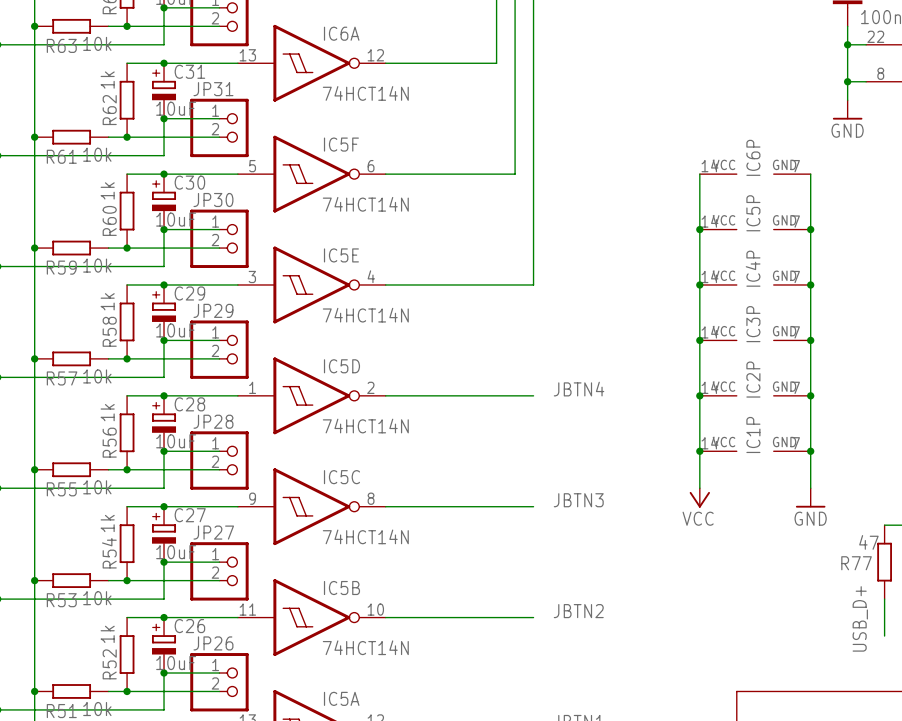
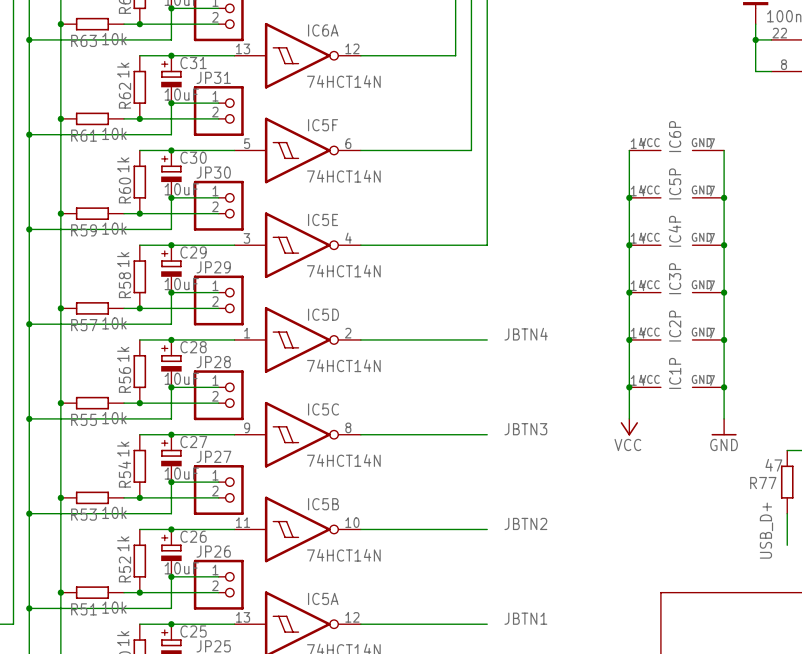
wire: (847, 81) (847, 100) -> none
junction: (847, 81) -> none
power symbol: GND (847, 109) -> none

